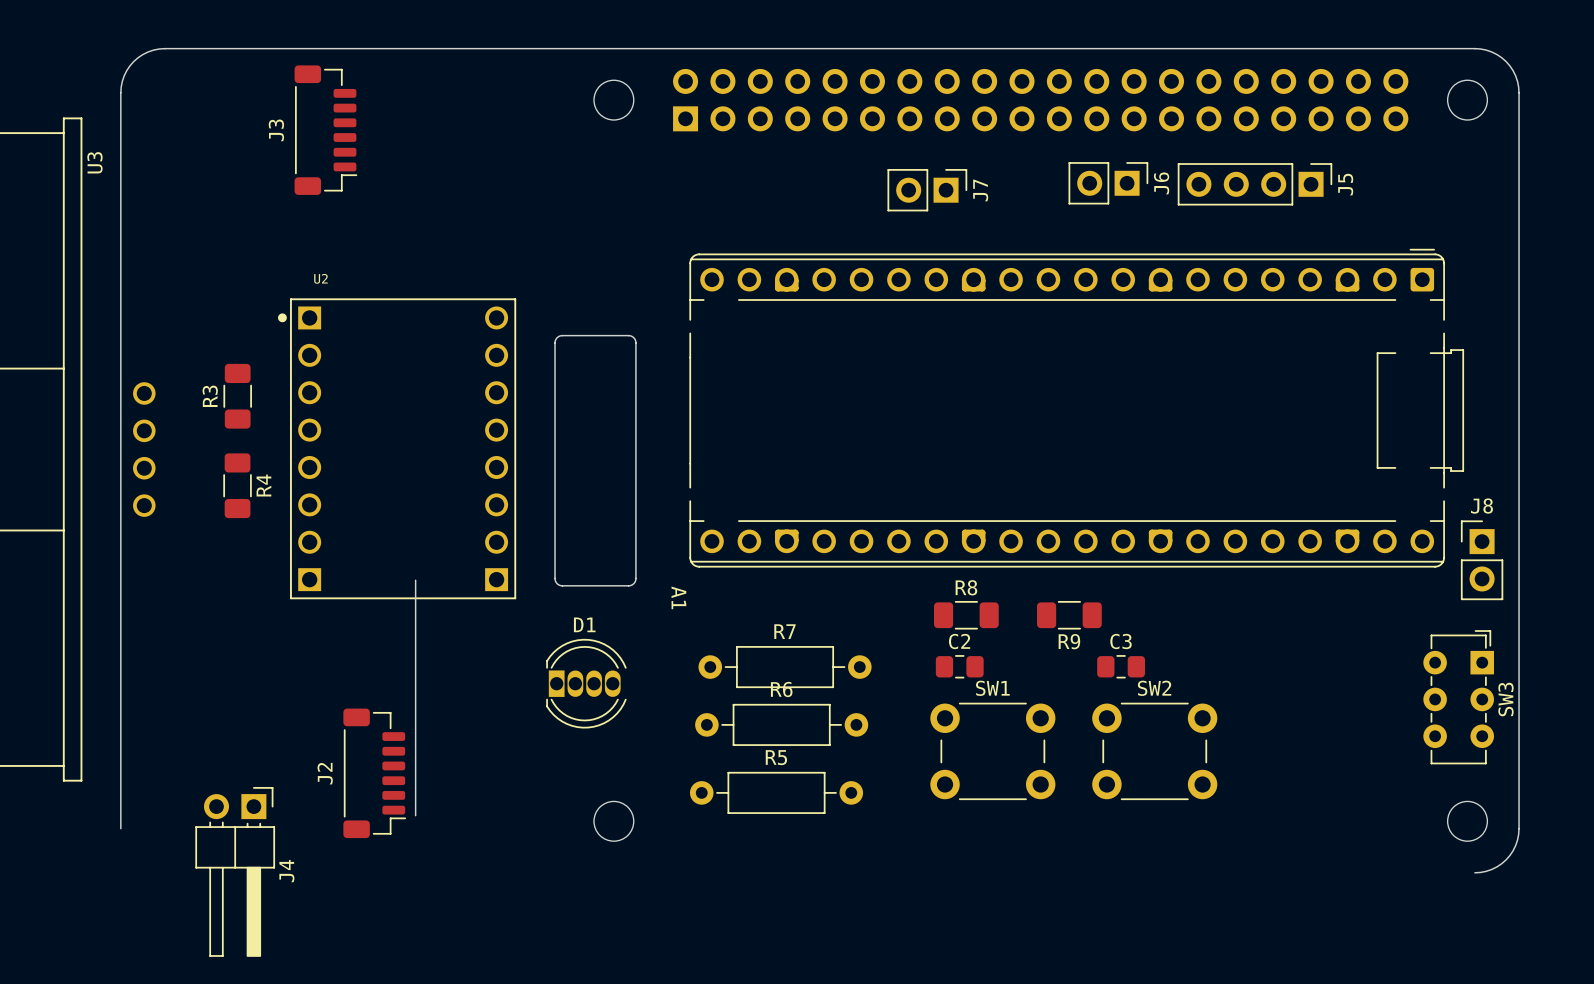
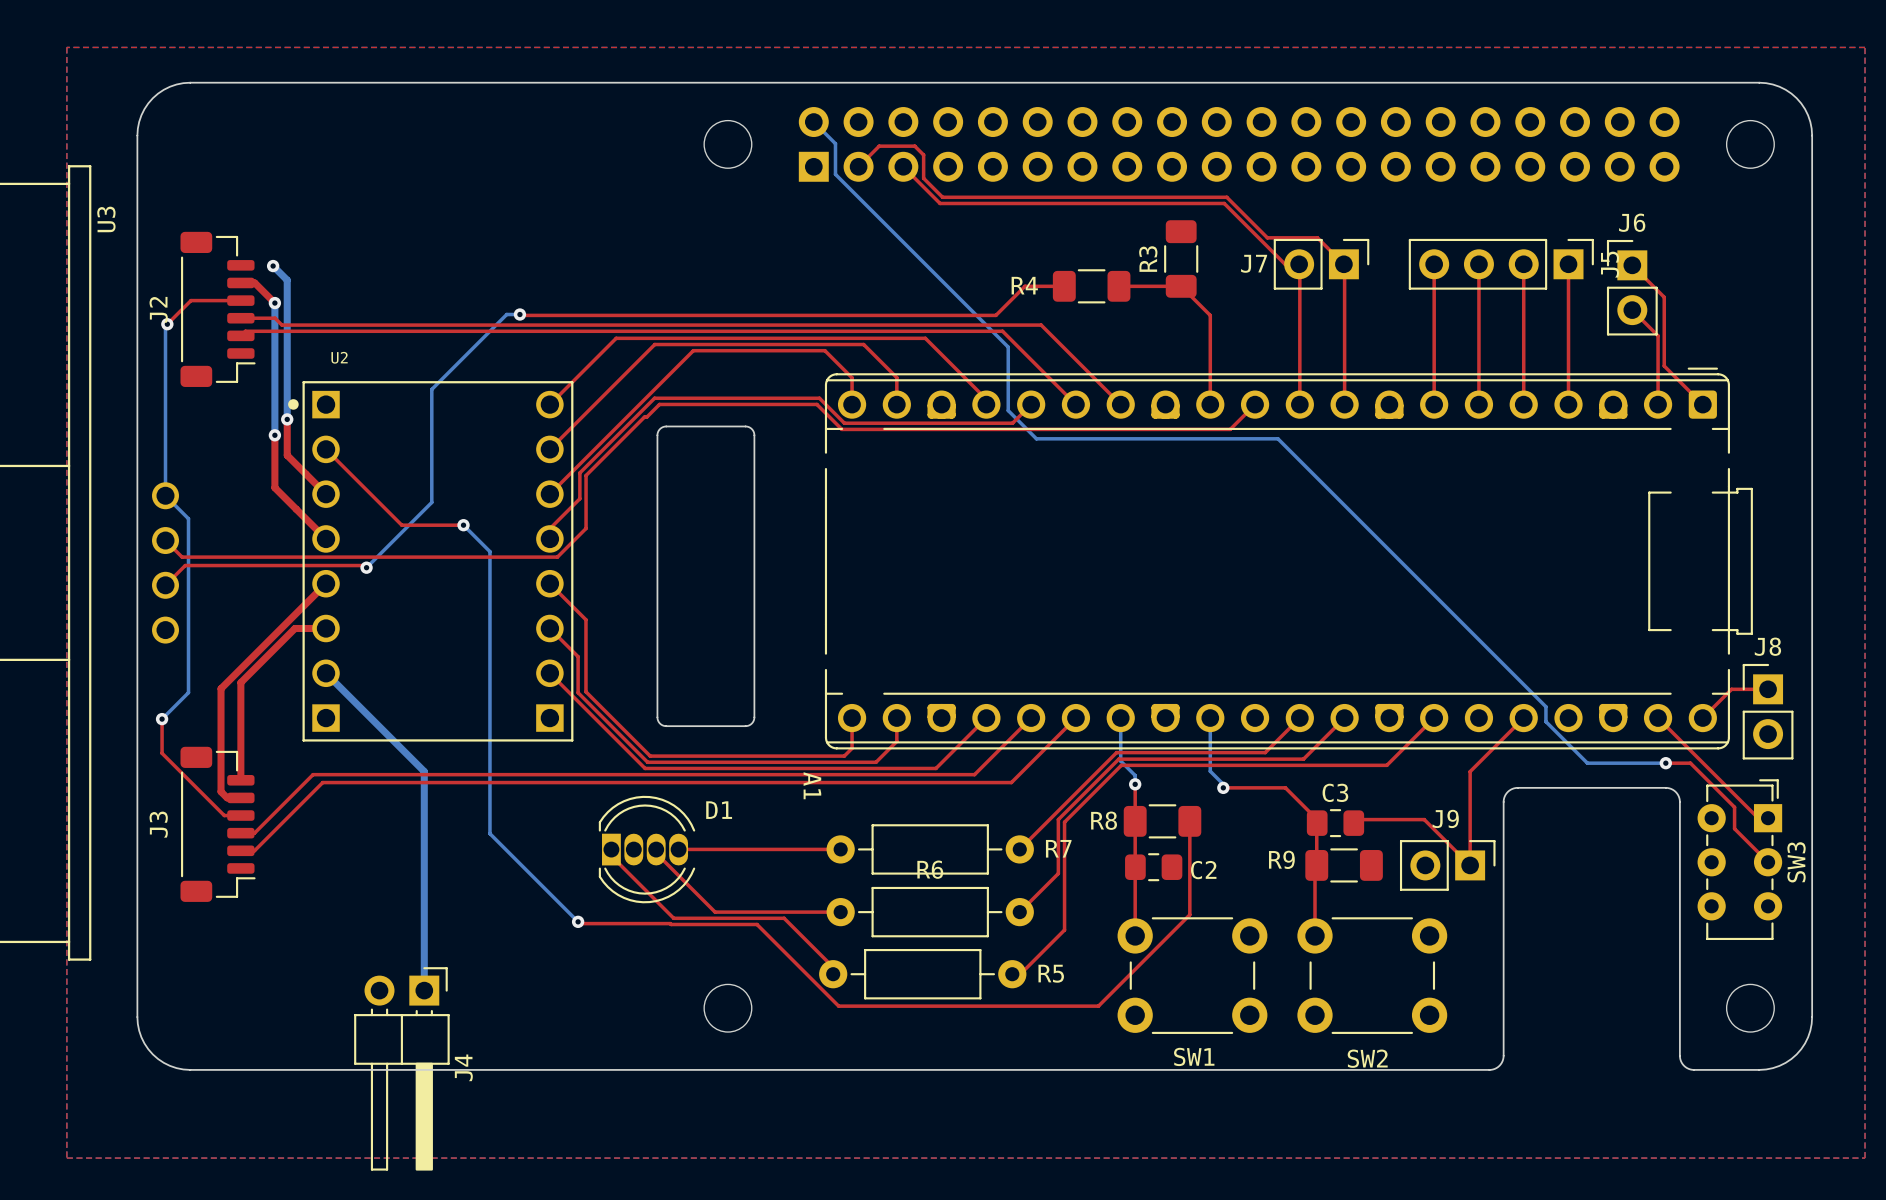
top zone outline: none -> (66, 47) (66, 1158) (1865, 1158) (1865, 47) (66, 47)
bottom track: none -> (813, 122) (835, 143) (835, 174) (1008, 347) (1008, 410) (1036, 438) (1277, 438) (1545, 706) (1545, 721) (1587, 763) (1665, 763)
top track: none -> (858, 166) (879, 146) (914, 146) (923, 154) (923, 178) (942, 197) (1226, 197) (1267, 237) (1317, 237) (1344, 264) (1344, 404)
top track: none -> (903, 166) (940, 203) (1224, 203) (1285, 264) (1299, 264) (1299, 404)
J3 position: (325, 130) -> (218, 824)
J6 rotation: 0° (1108, 183) -> 90° counterclockwise (1632, 287)
J6 position: (1108, 183) -> (1632, 287)
J5 position: (1254, 184) -> (1501, 264)
J7 position: (927, 190) -> (1321, 264)
J7 name rotation: 0° (980, 190) -> 90° clockwise (1254, 263)
J7 name position: J7 (980, 190) -> J7 (1254, 263)
top track: none -> (1434, 264) (1434, 404)
top track: none -> (1478, 264) (1478, 404)
top track: none -> (1523, 264) (1523, 404)
top track: none -> (1568, 264) (1568, 404)
bottom track: none -> (273, 266) (287, 280) (287, 419)
via: none -> (273, 266)
top track: none -> (1632, 265) (1664, 297) (1664, 366) (1702, 404)
top track: none -> (240, 282) (254, 282) (274, 303)
top track: none -> (1064, 286) (1025, 286) (995, 315) (519, 314)
top track: none -> (1118, 286) (1181, 286) (1210, 315) (1210, 404)
top track: none -> (240, 300) (190, 300) (167, 324)
bottom track: none -> (274, 303) (274, 435)
via: none -> (274, 303)
top track: none -> (1632, 310) (1658, 335) (1658, 404)
bottom track: none -> (519, 314) (506, 314) (431, 389) (431, 502) (366, 567)
via: none -> (519, 314)
top track: none -> (240, 318) (275, 318) (281, 325) (1041, 325) (1120, 404)
A1 footprint: [689, 248, 1465, 568] -> [824, 367, 1753, 750]
bottom track: none -> (167, 324) (165, 326) (165, 495) (188, 518) (188, 692) (162, 719)
via: none -> (167, 324)
top track: none -> (240, 335) (245, 331) (1002, 331) (1075, 404)
top track: none -> (549, 404) (616, 338) (925, 338) (986, 399) (986, 404)
top track: none -> (852, 404) (852, 377) (824, 350) (693, 350) (549, 494)
top track: none -> (896, 404) (896, 377) (863, 344) (654, 344) (549, 449)
top track: none -> (1031, 404) (1012, 423) (844, 423) (819, 398) (654, 398) (579, 472) (579, 498) (549, 528) (549, 538)
top track: none -> (1255, 404) (1230, 429) (841, 429) (816, 404) (659, 404) (586, 475) (586, 528) (557, 557) (182, 557) (165, 540)
top track: none -> (287, 419) (287, 455) (326, 494)
via: none -> (287, 419)
top track: none -> (274, 435) (274, 487) (326, 538)
via: none -> (274, 435)
top track: none -> (326, 449) (401, 525) (463, 525)
R3 position: (237, 396) -> (1181, 258)
bottom track: none -> (463, 525) (489, 551) (489, 833) (578, 921)
via: none -> (463, 525)
U2 position: (397, 448) -> (430, 561)
top track: none -> (366, 567) (364, 565) (185, 565) (165, 585)
via: none -> (366, 567)
top track: none -> (326, 583) (221, 688) (221, 791) (227, 797) (240, 797)
top track: none -> (549, 583) (585, 619) (585, 691) (650, 756) (844, 756) (852, 748) (852, 718)
R4 rotation: 0° (237, 485) -> 90° clockwise (1091, 286)
R4 position: (237, 485) -> (1091, 286)
R4 name position: R4 (263, 485) -> R4 (1024, 285)
top track: none -> (326, 628) (294, 628) (240, 682) (240, 780)
top track: none -> (549, 628) (578, 656) (578, 692) (647, 762) (876, 762) (896, 741) (896, 718)
bottom track: none -> (326, 673) (424, 771) (424, 990)
top track: none -> (549, 673) (645, 768) (935, 768) (986, 718)
top track: none -> (1768, 689) (1731, 689) (1702, 718)
J8 position: (1482, 560) -> (1768, 711)
top track: none -> (162, 719) (162, 753) (224, 815) (240, 815)
via: none -> (162, 719)
top track: none -> (1031, 718) (974, 774) (313, 774) (254, 833) (240, 833)
top track: none -> (1075, 718) (1011, 782) (322, 782) (254, 850) (240, 850)
bottom track: none -> (1120, 718) (1120, 761) (1135, 775) (1135, 784)
bottom track: none -> (1210, 718) (1210, 771) (1223, 784) (1223, 787)
top track: none -> (1299, 718) (1265, 752) (1116, 752) (1019, 849)
top track: none -> (1344, 718) (1303, 759) (1118, 759) (1058, 819) (1058, 873) (1019, 912)
top track: none -> (1434, 718) (1386, 765) (1121, 765) (1064, 822) (1064, 930) (1019, 974)
top track: none -> (1523, 718) (1470, 771) (1470, 865) (1424, 819) (1353, 819)
top track: none -> (1658, 718) (1758, 818) (1768, 818)
board edge: (415, 580) (415, 815) -> none
R8 name position: R8 (966, 587) -> R8 (1104, 820)
R8 position: (966, 615) -> (1162, 821)
R9 position: (1069, 615) -> (1344, 865)
top track: none -> (1665, 763) (1690, 763) (1734, 807) (1734, 828) (1768, 862)
via: none -> (1665, 763)
D1 name position: D1 (584, 624) -> D1 (719, 810)
R7 name position: R7 (784, 631) -> R7 (1058, 848)
top track: none -> (1135, 784) (1135, 864)
via: none -> (1135, 784)
top track: none -> (1223, 787) (1285, 787) (1317, 819) (1315, 935)
via: none -> (1223, 787)
C2 name position: C2 (959, 641) -> C2 (1203, 870)
R9 name position: R9 (1069, 641) -> R9 (1281, 859)
top track: none -> (1189, 821) (1189, 914) (1098, 1006) (838, 1006) (757, 924) (579, 923) (578, 921)
C2 position: (959, 666) -> (1153, 867)
R7 position: (785, 667) -> (930, 849)
D1 position: (586, 683) -> (647, 849)
top track: none -> (611, 849) (611, 856) (673, 918) (784, 918) (840, 974)
top track: none -> (656, 849) (656, 853) (715, 912) (840, 912)
top track: none -> (680, 849) (840, 849)
SW1 name position: SW1 (992, 688) -> SW1 (1194, 1056)
SW2 name position: SW2 (1154, 688) -> SW2 (1367, 1058)
J9: none -> (1447, 865)
top track: none -> (1135, 867) (1135, 935)
R6 position: (781, 724) -> (930, 912)
via: none -> (578, 921)
SW1 position: (992, 751) -> (1192, 975)
SW2 position: (1154, 751) -> (1372, 975)
R5 name position: R5 (776, 757) -> R5 (1051, 973)
J2 position: (374, 773) -> (218, 309)
board edge: none -> (137, 1017) (141, 1037) (152, 1054) (170, 1065) (190, 1069) (1491, 1069) (1499, 1065) (1503, 1055) (1503, 801) (1505, 794) (1510, 789) (1517, 787) (1665, 787) (1675, 791) (1679, 801) (1680, 1059) (1685, 1067) (1692, 1069) (1759, 1069)
J4 position: (235, 871) -> (401, 1068)

